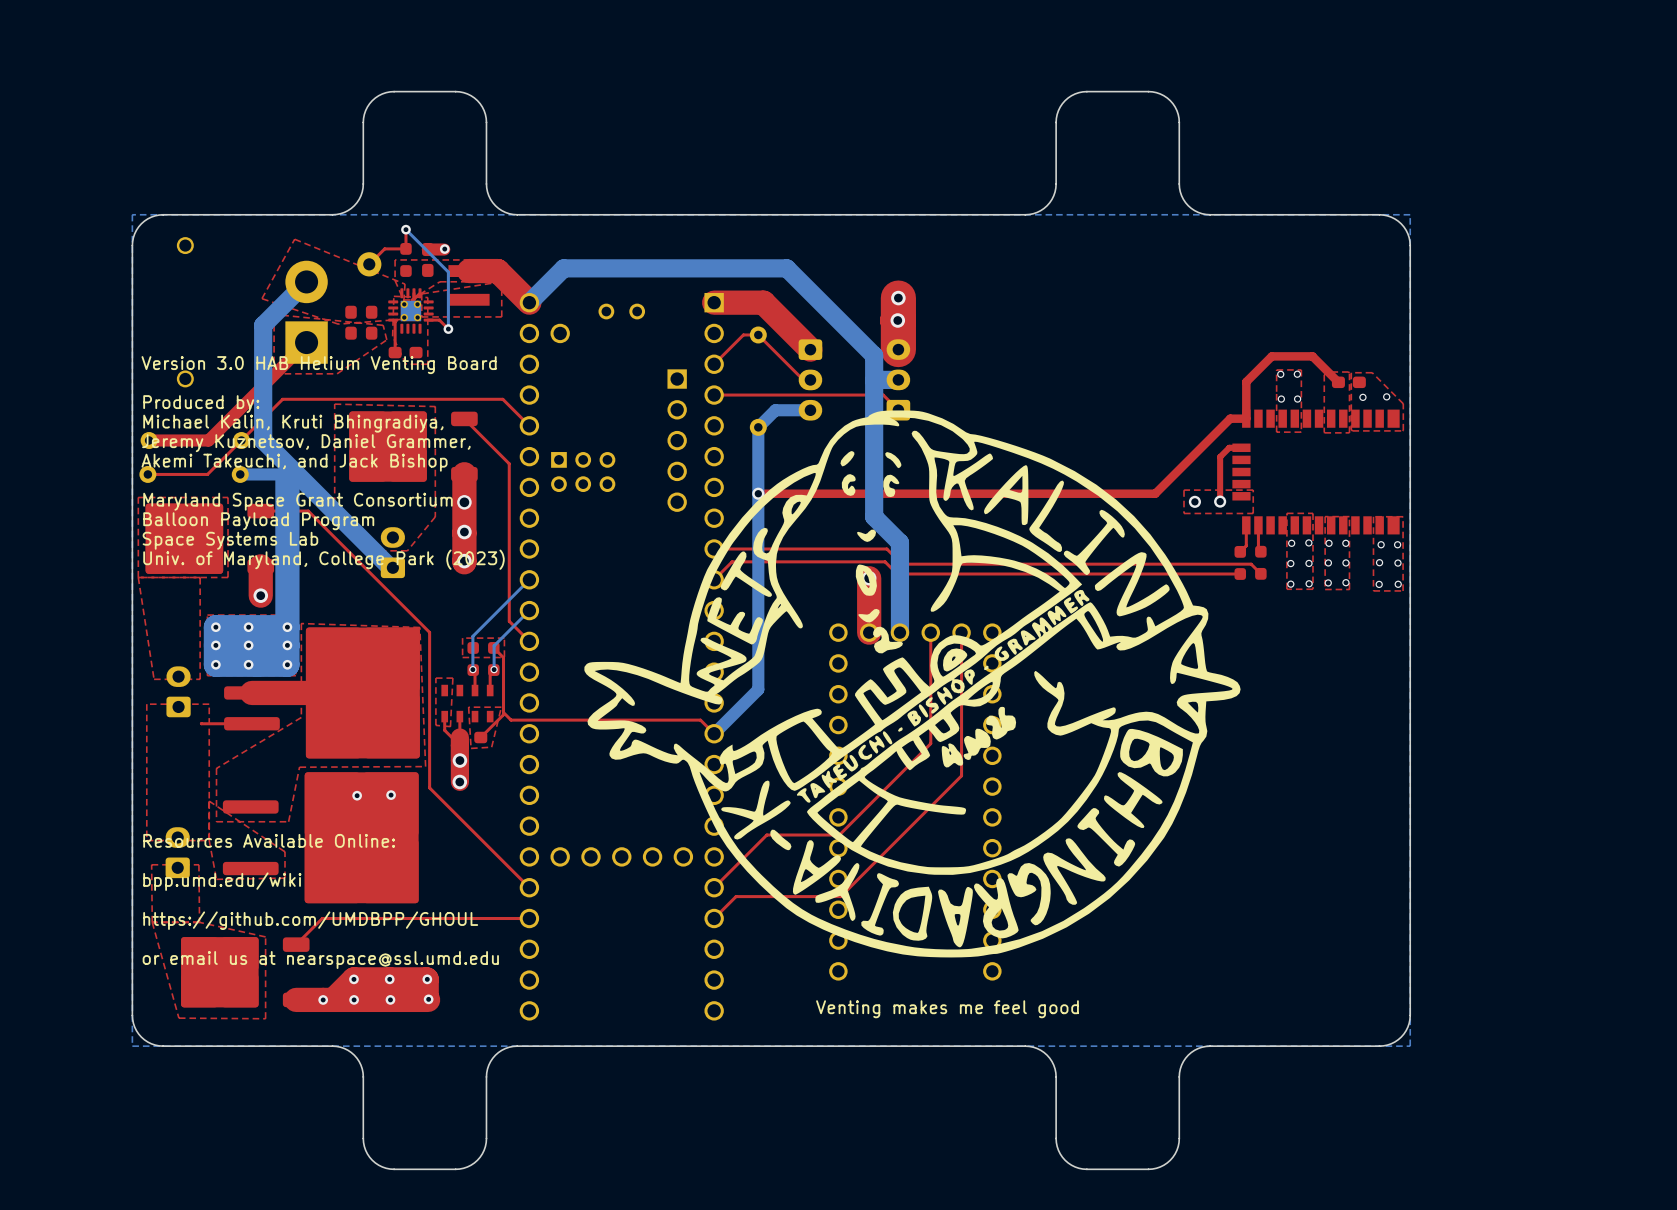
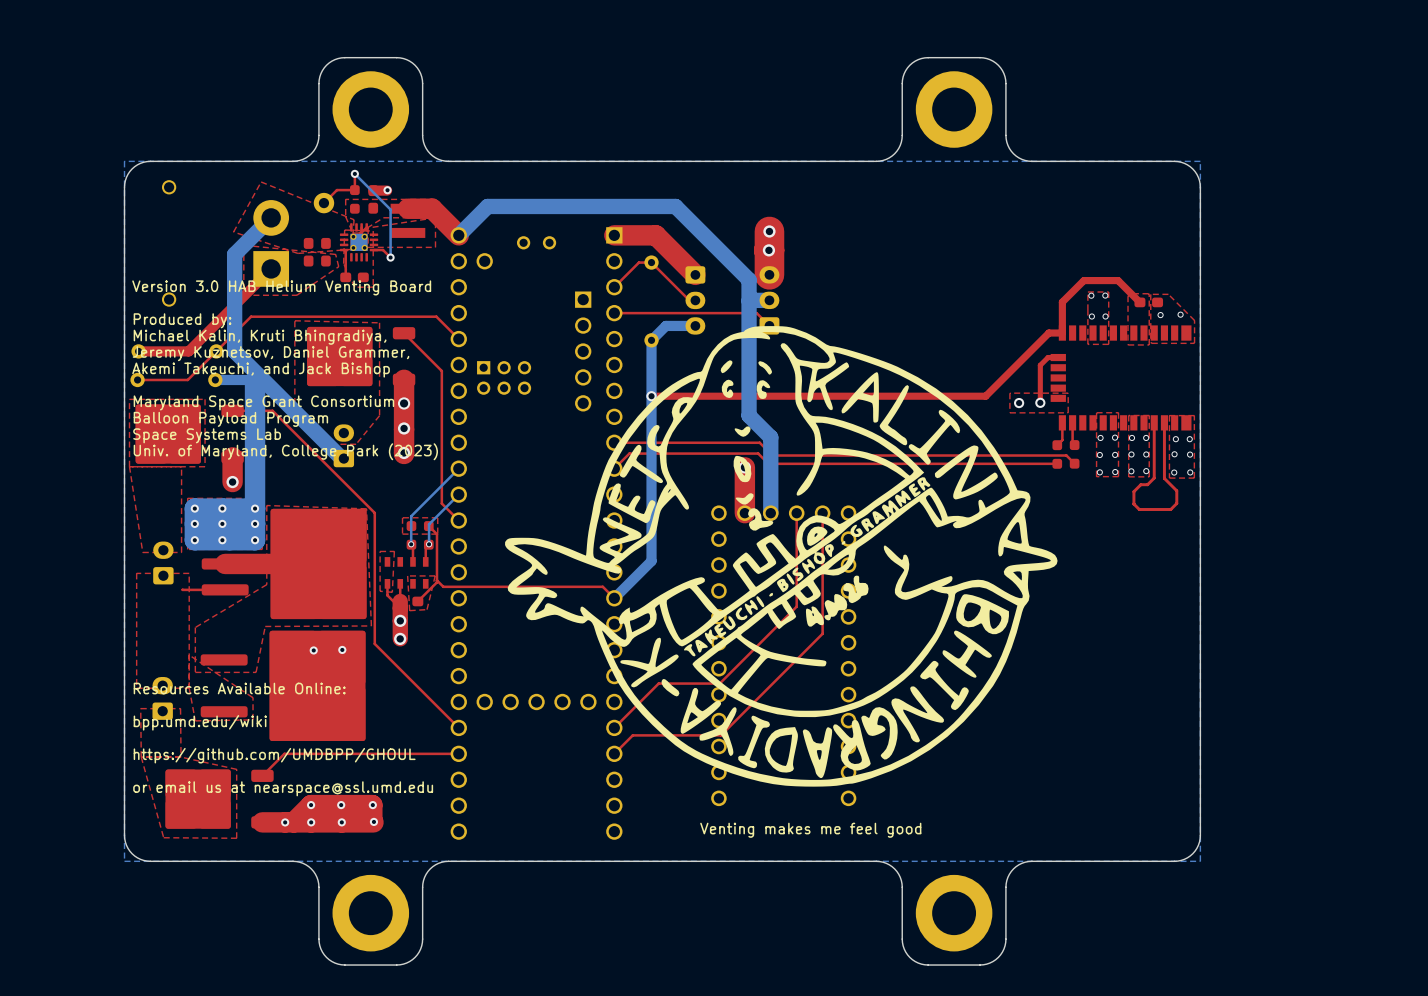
part: none -> (370, 109)
part: none -> (954, 109)
top track: none -> (1154, 422) (1154, 478) (1147, 484) (1140, 484) (1133, 491) (1133, 503)
top track: none -> (1164, 422) (1164, 478) (1176, 490) (1176, 503) (1170, 509) (1139, 509) (1133, 503)
part: none -> (370, 913)
part: none -> (954, 913)

